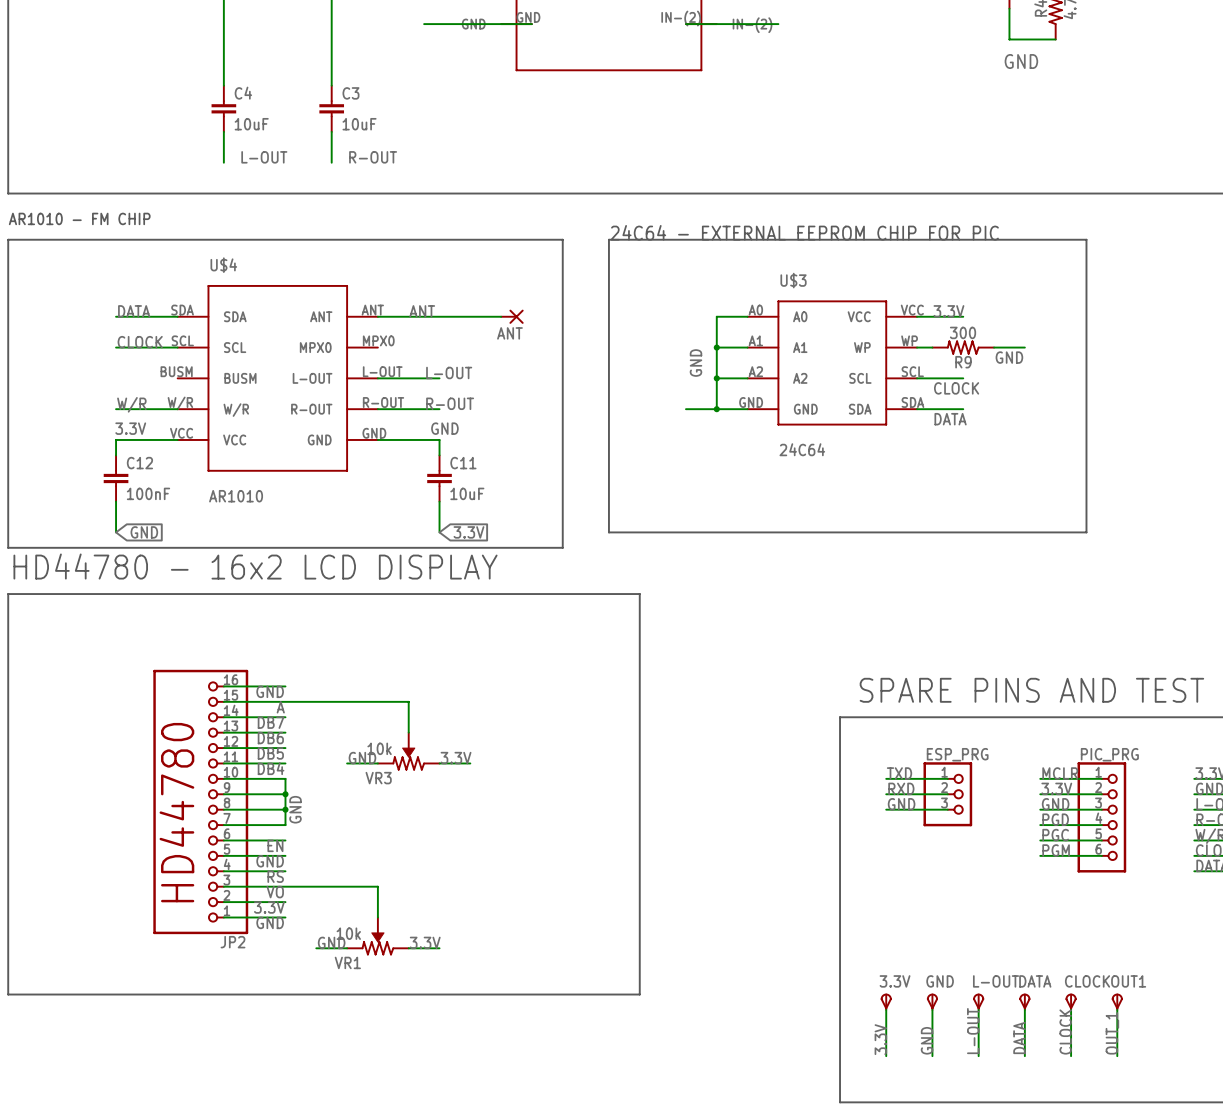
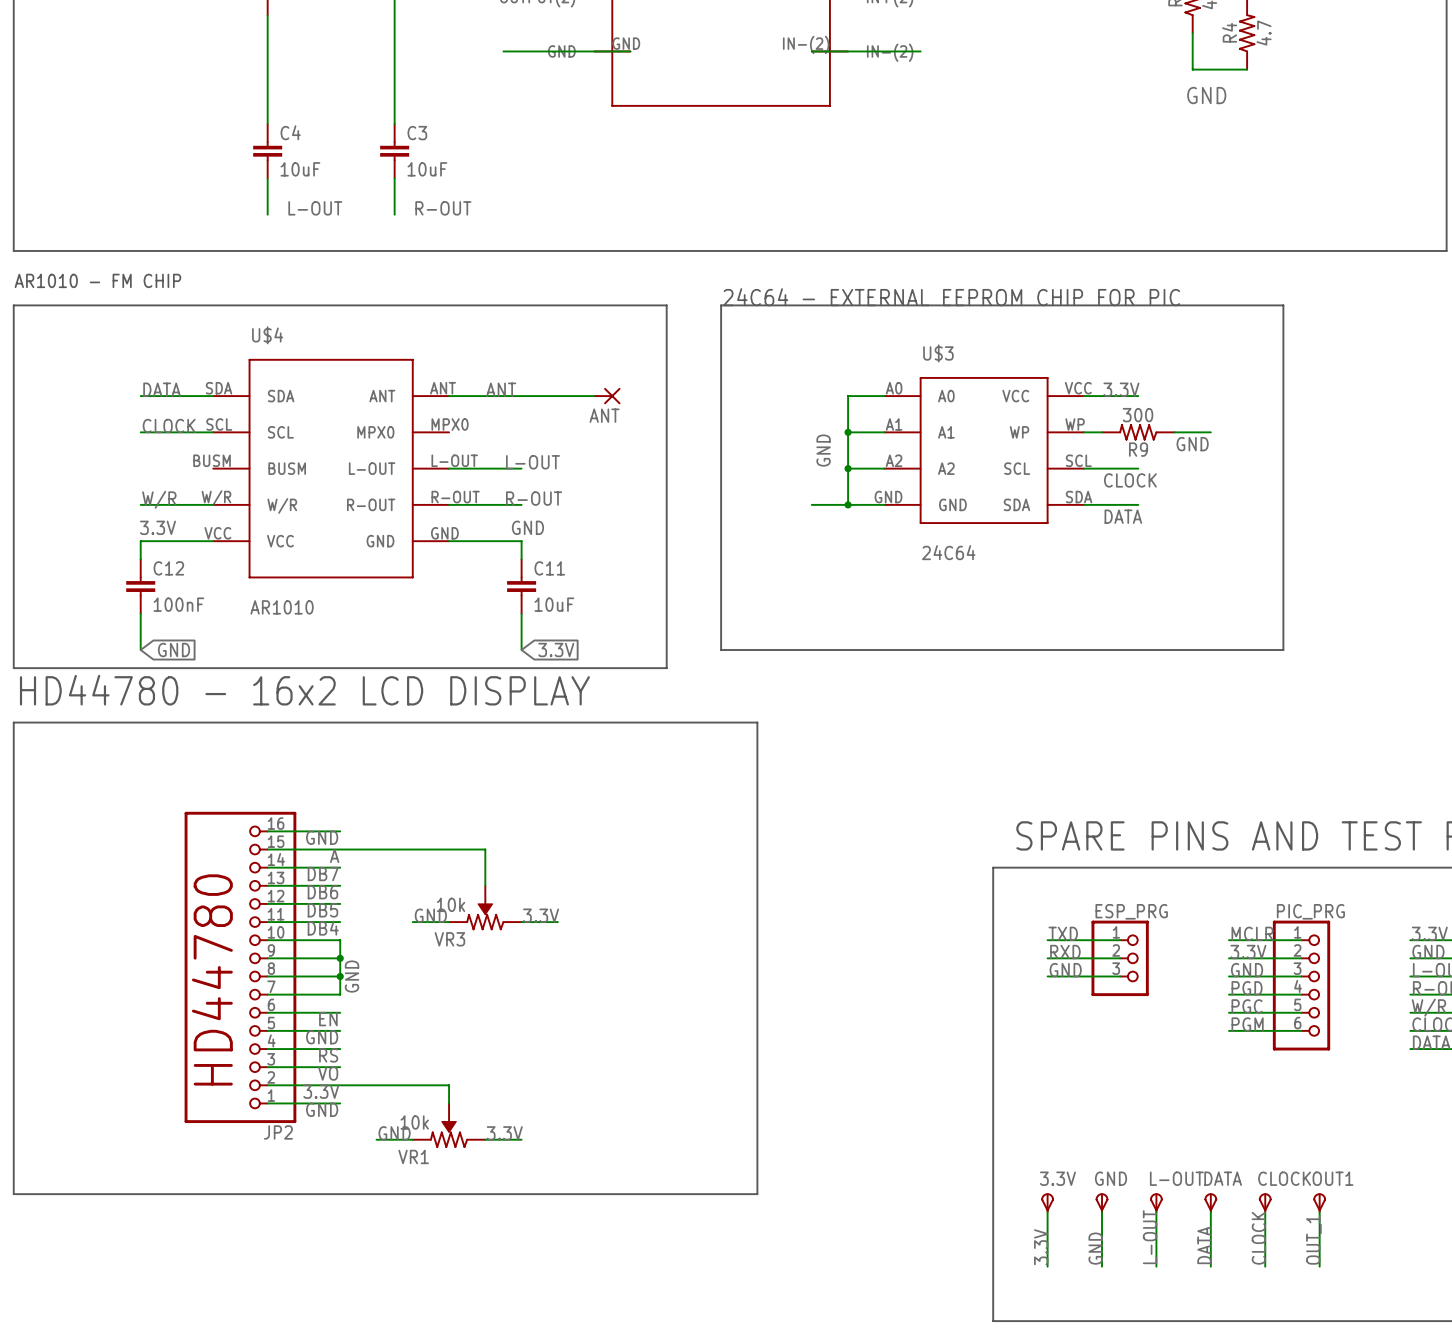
wire: (285, 886) (377, 886) (377, 902) -> (340, 1085) (449, 1085)

